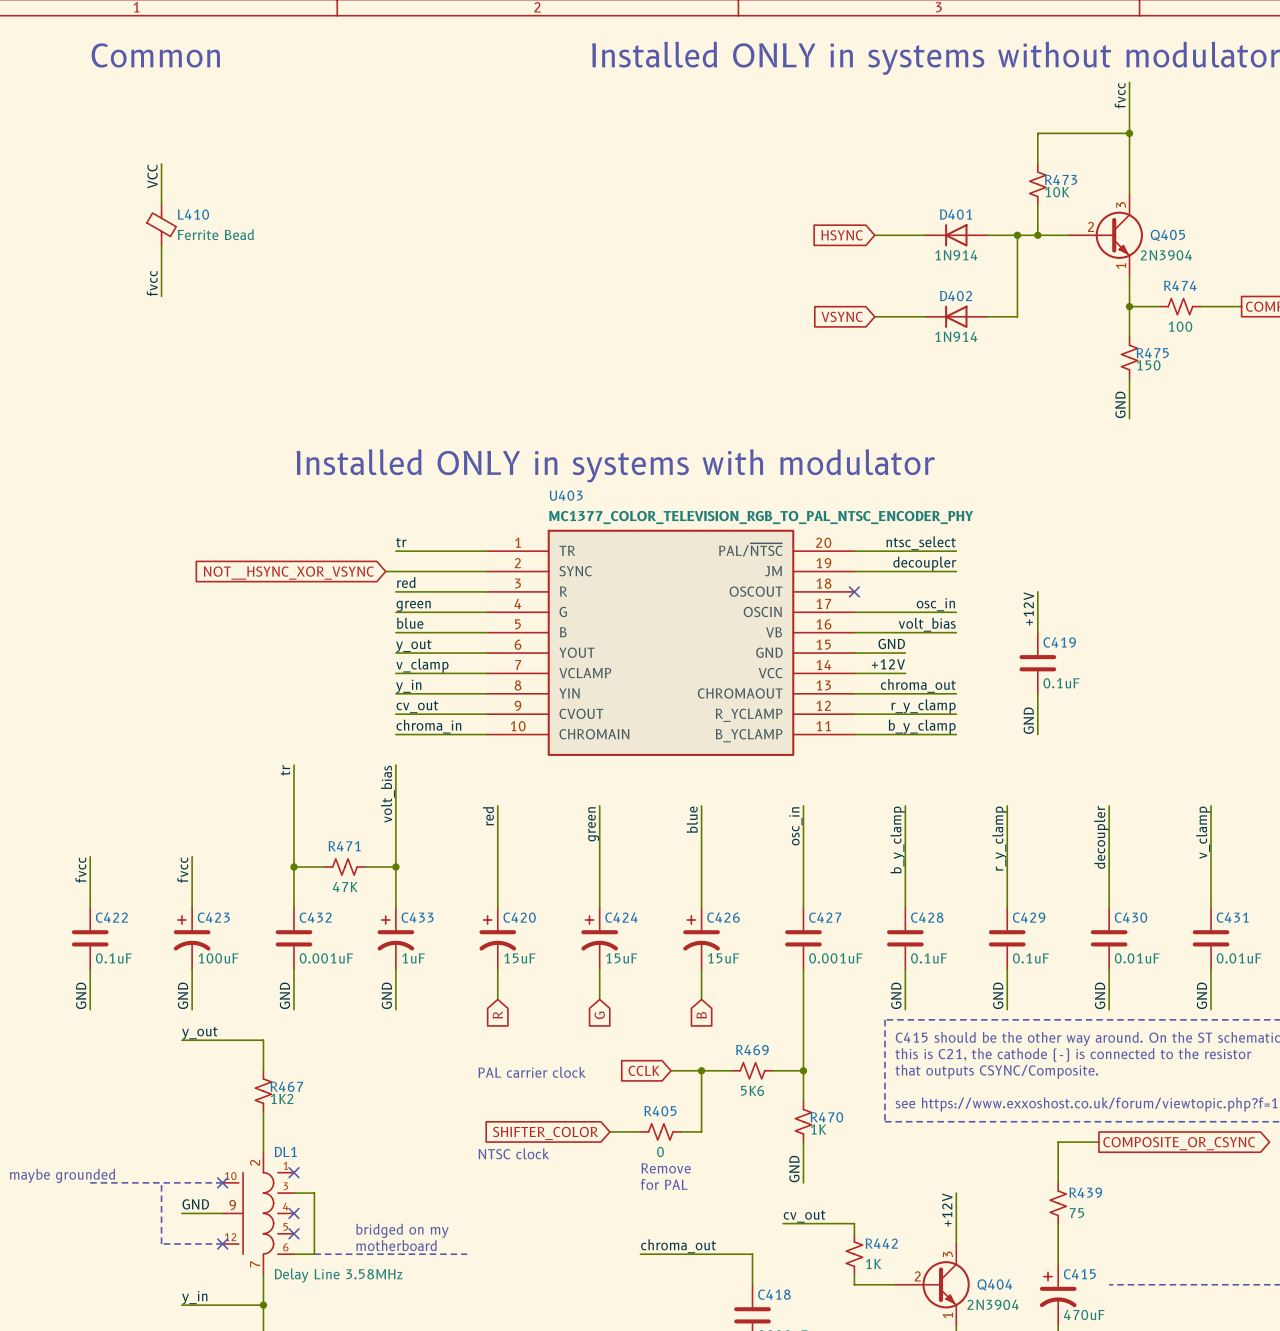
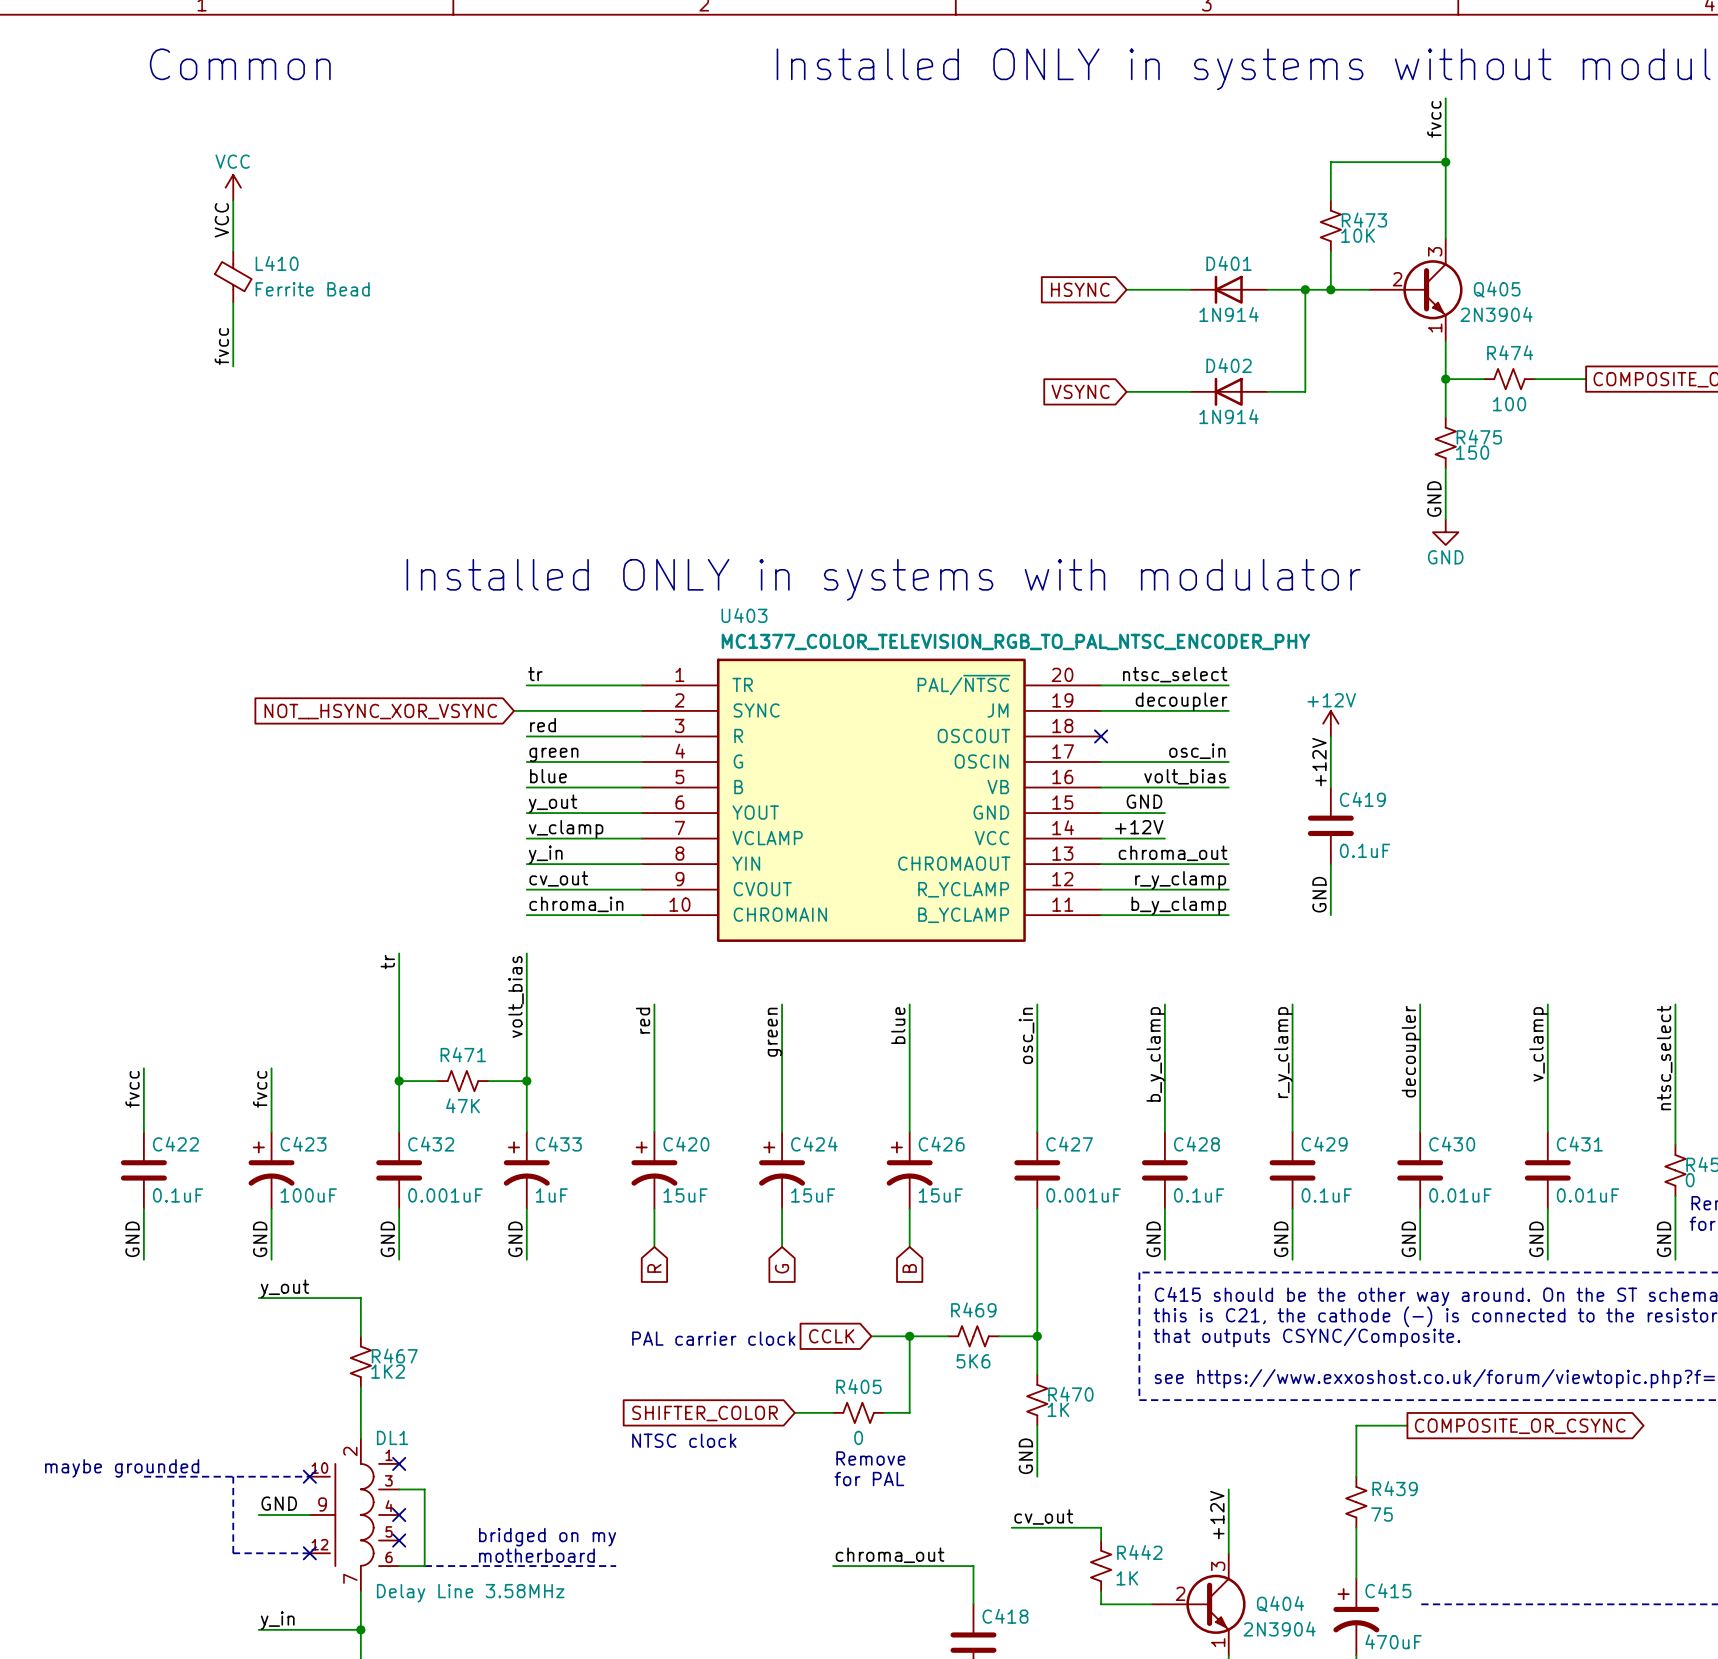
power symbol: none -> VCC (233, 187)
power symbol: none -> GND (1445, 532)
power symbol: none -> +12V (1330, 723)

